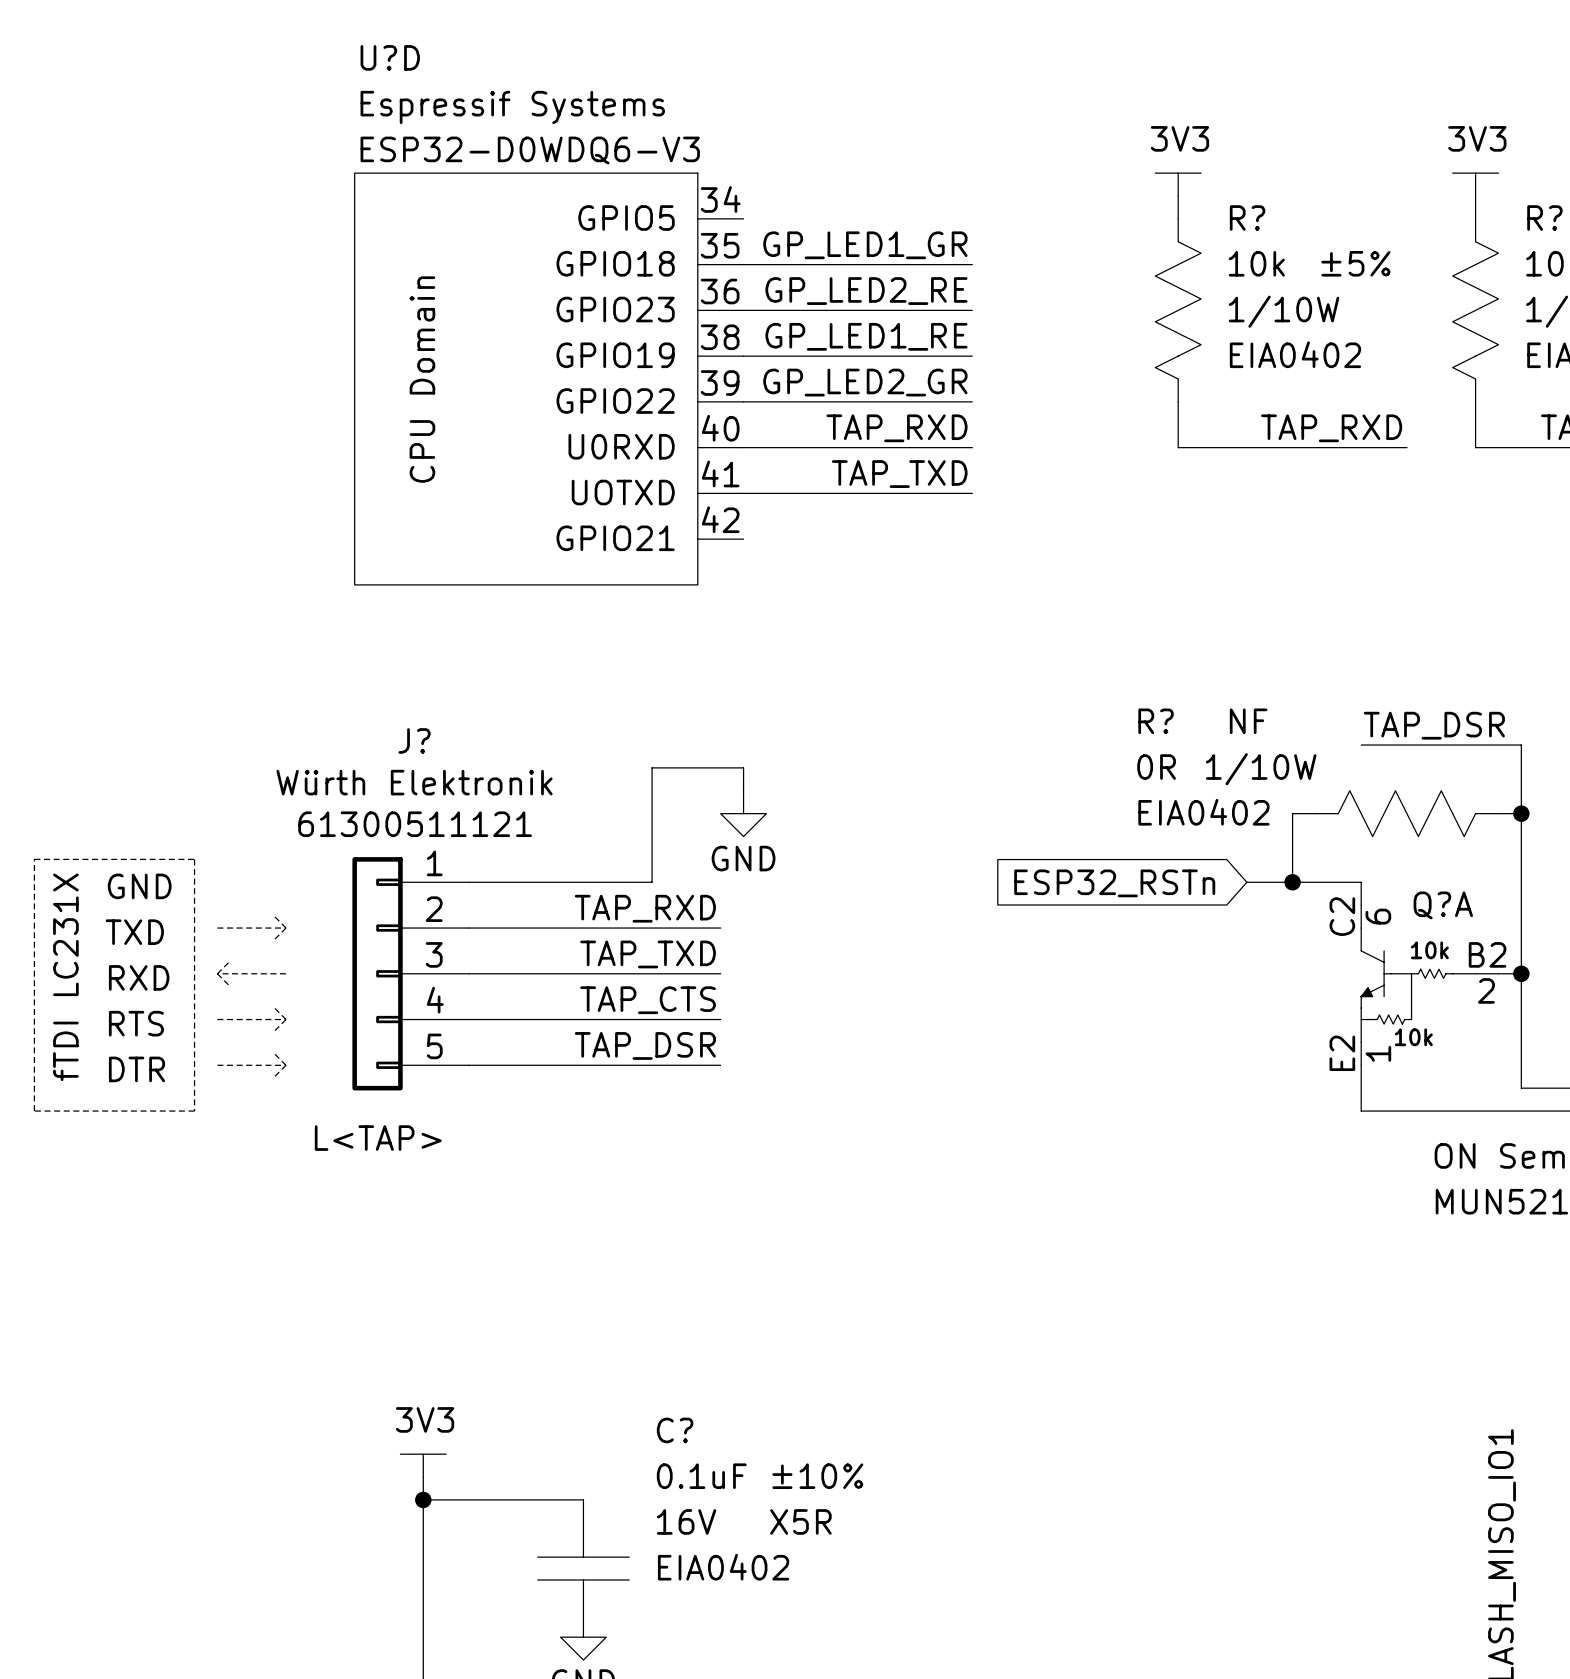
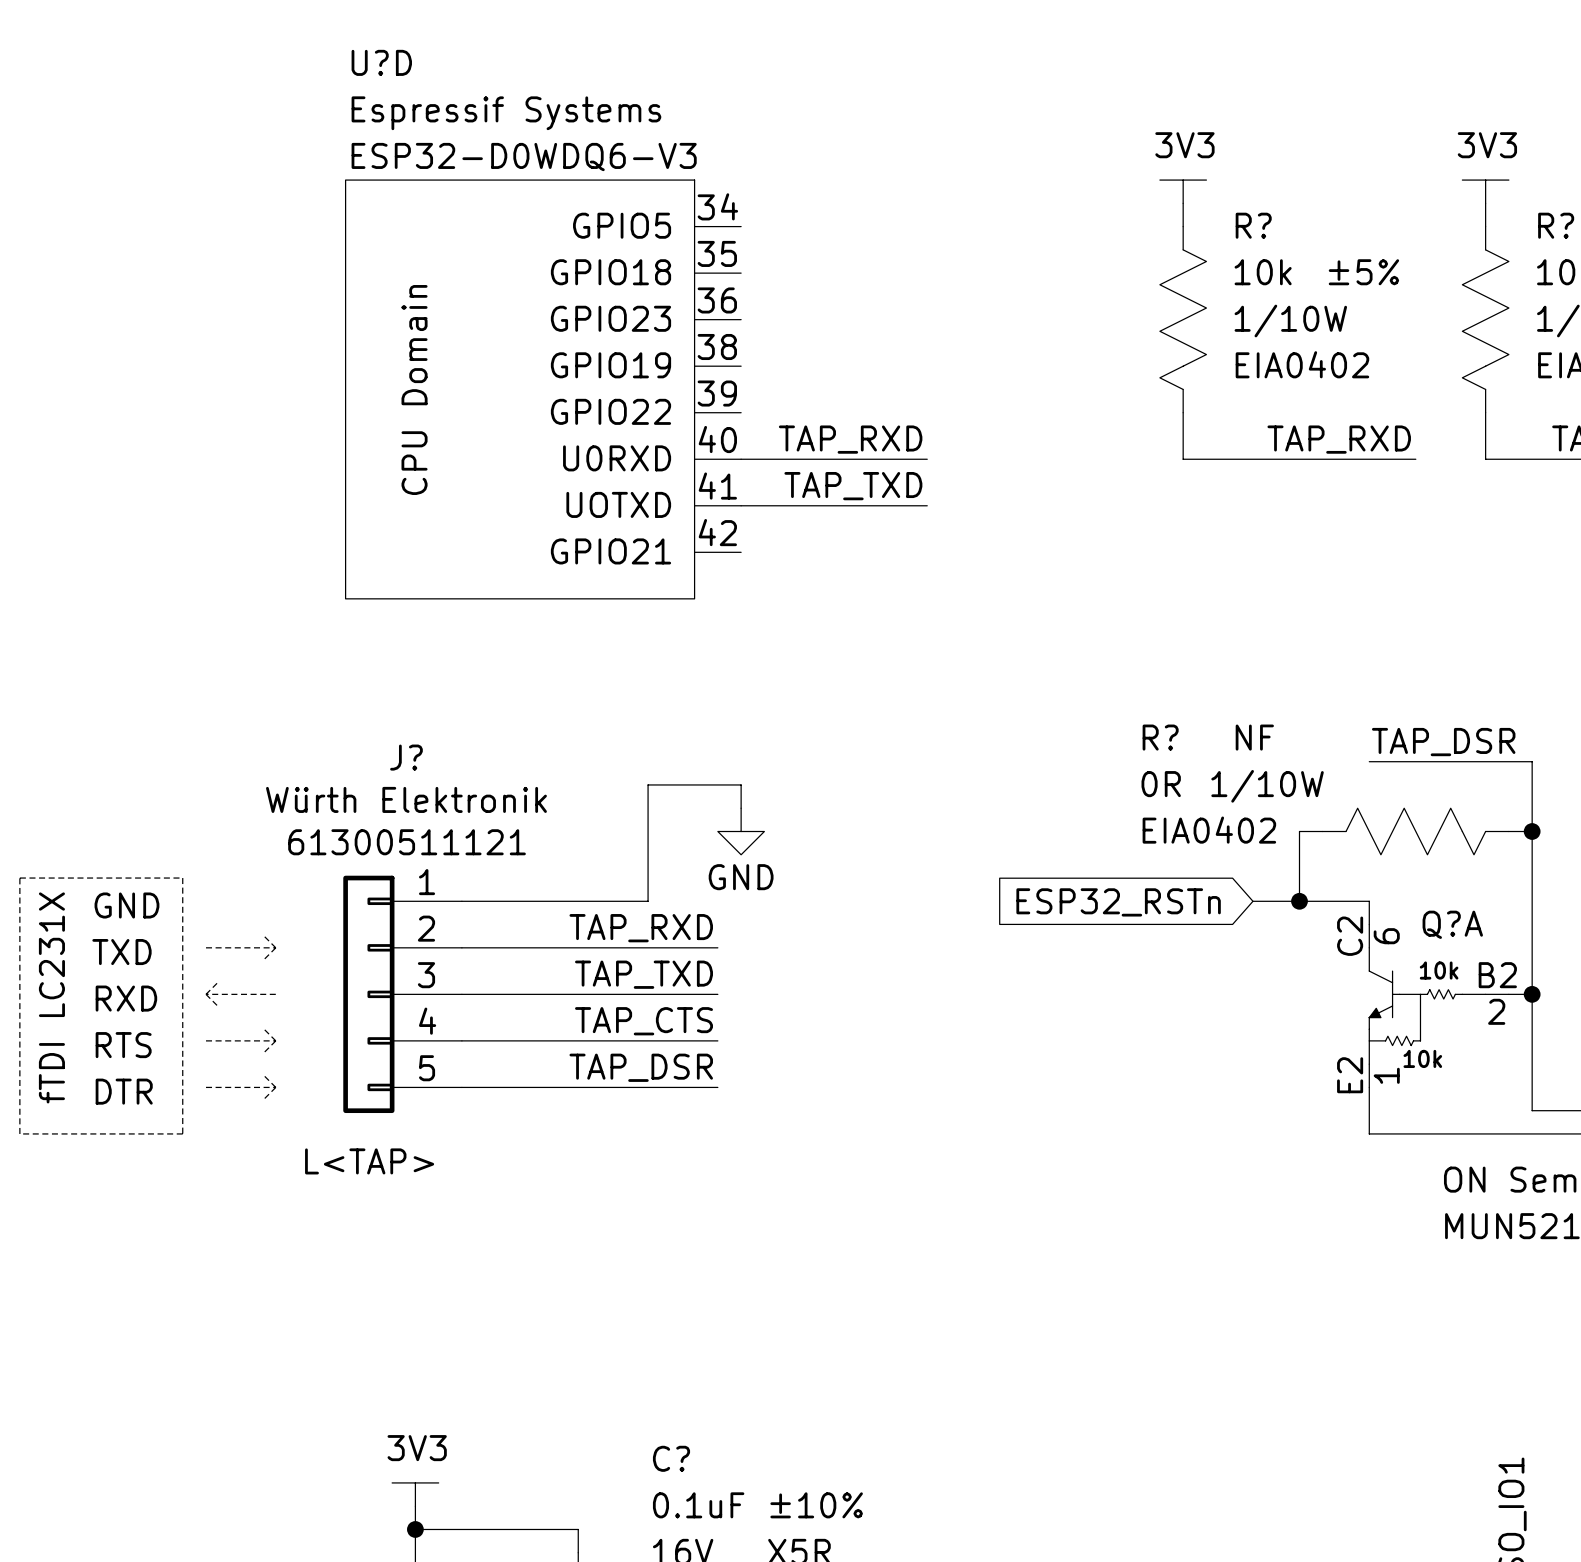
label: GP_LED1_GR (865, 245) -> none
wire: (743, 264) (972, 264) -> none
label: GP_LED2_RE (866, 291) -> none
wire: (743, 310) (972, 310) -> none
label: GP_LED1_RE (866, 336) -> none
wire: (743, 356) (972, 356) -> none
label: GP_LED2_GR (865, 382) -> none
wire: (743, 401) (972, 401) -> none
label position: TAP_RXD (896, 428) -> TAP_RXD (850, 439)
wire: (926, 447) (972, 447) -> none
label position: TAP_TXD (899, 474) -> TAP_TXD (853, 486)
wire: (926, 493) (972, 493) -> none

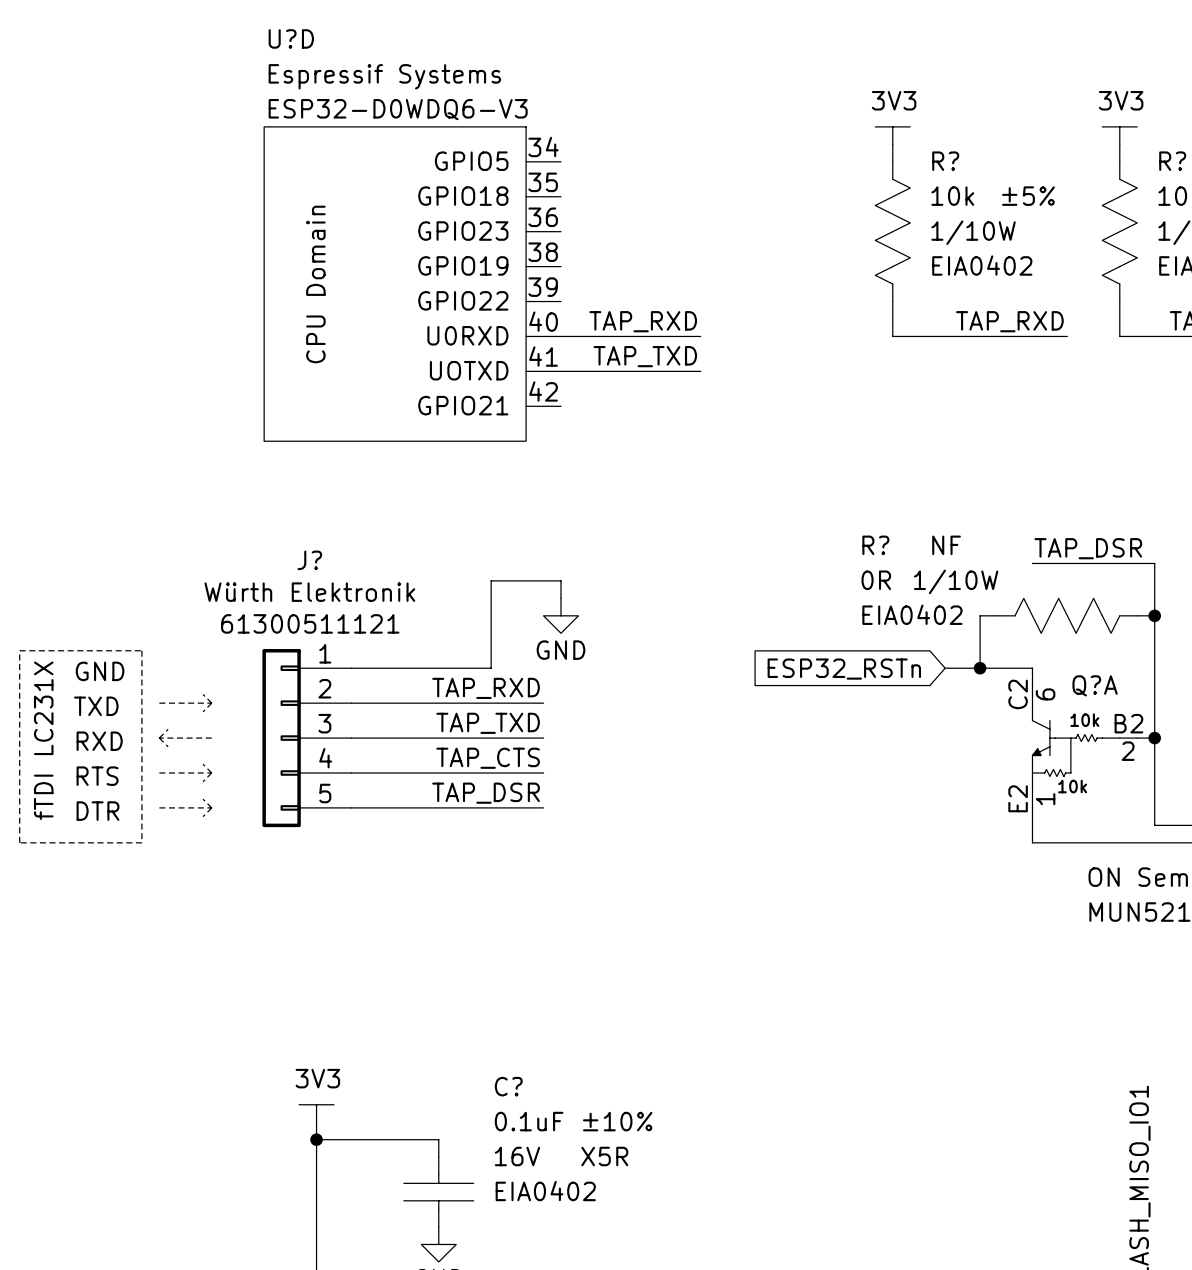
text: L<TAP> (369, 1161) -> none

